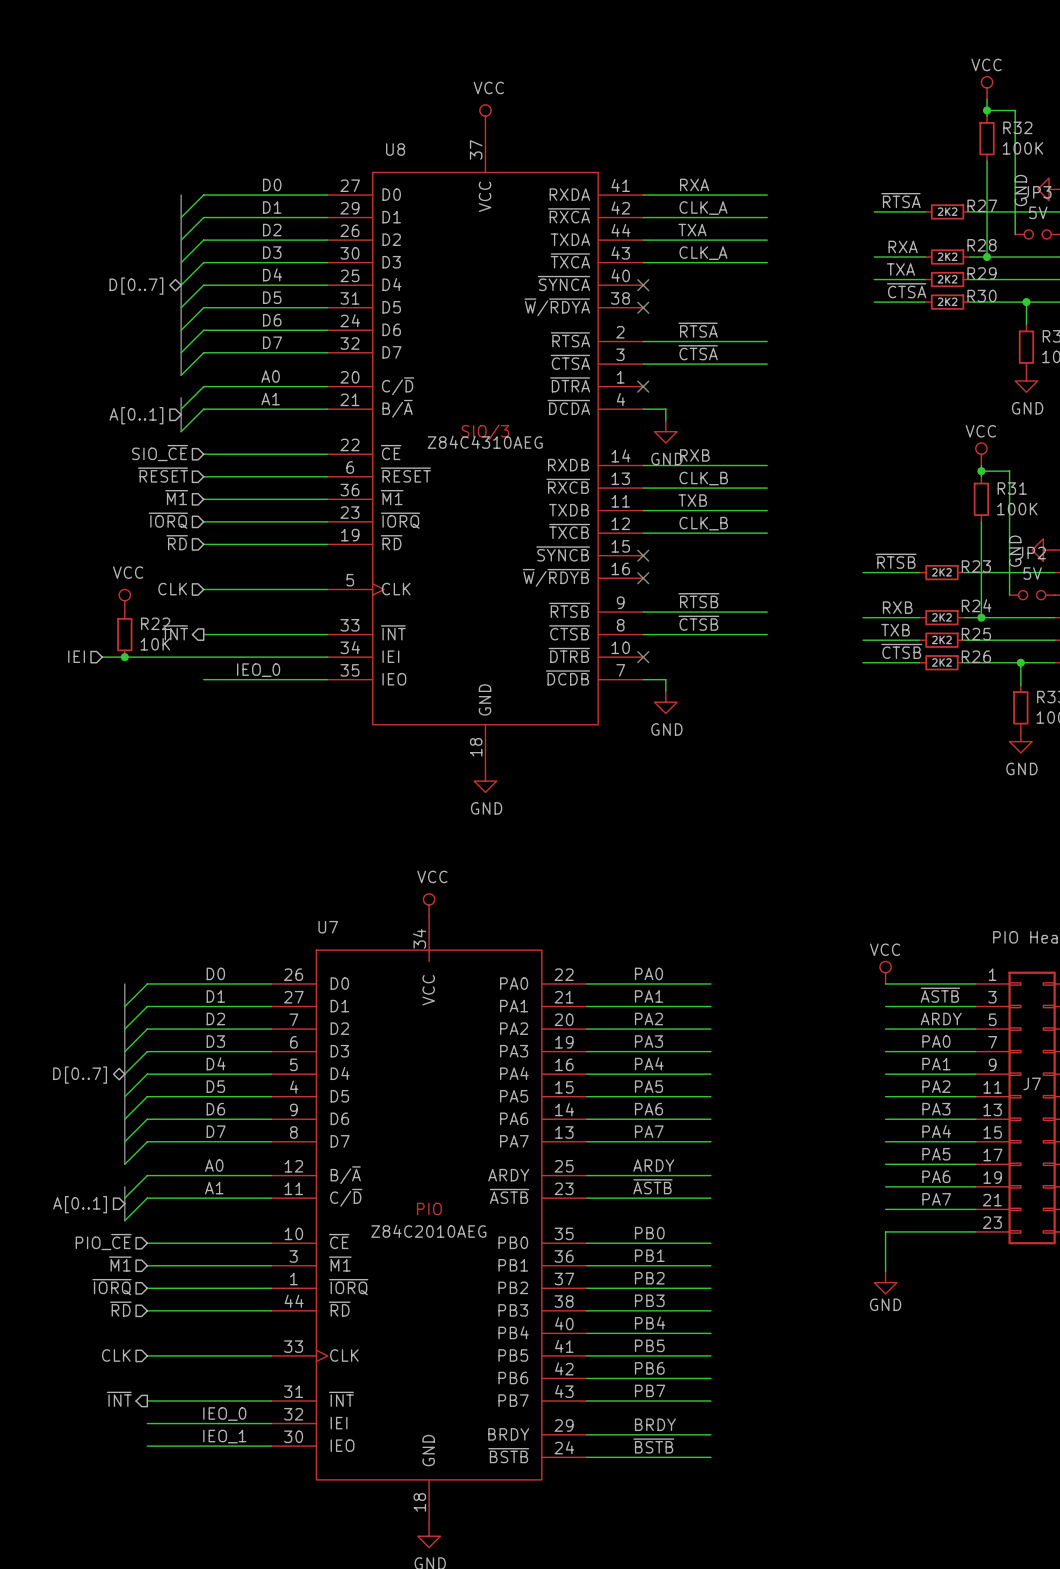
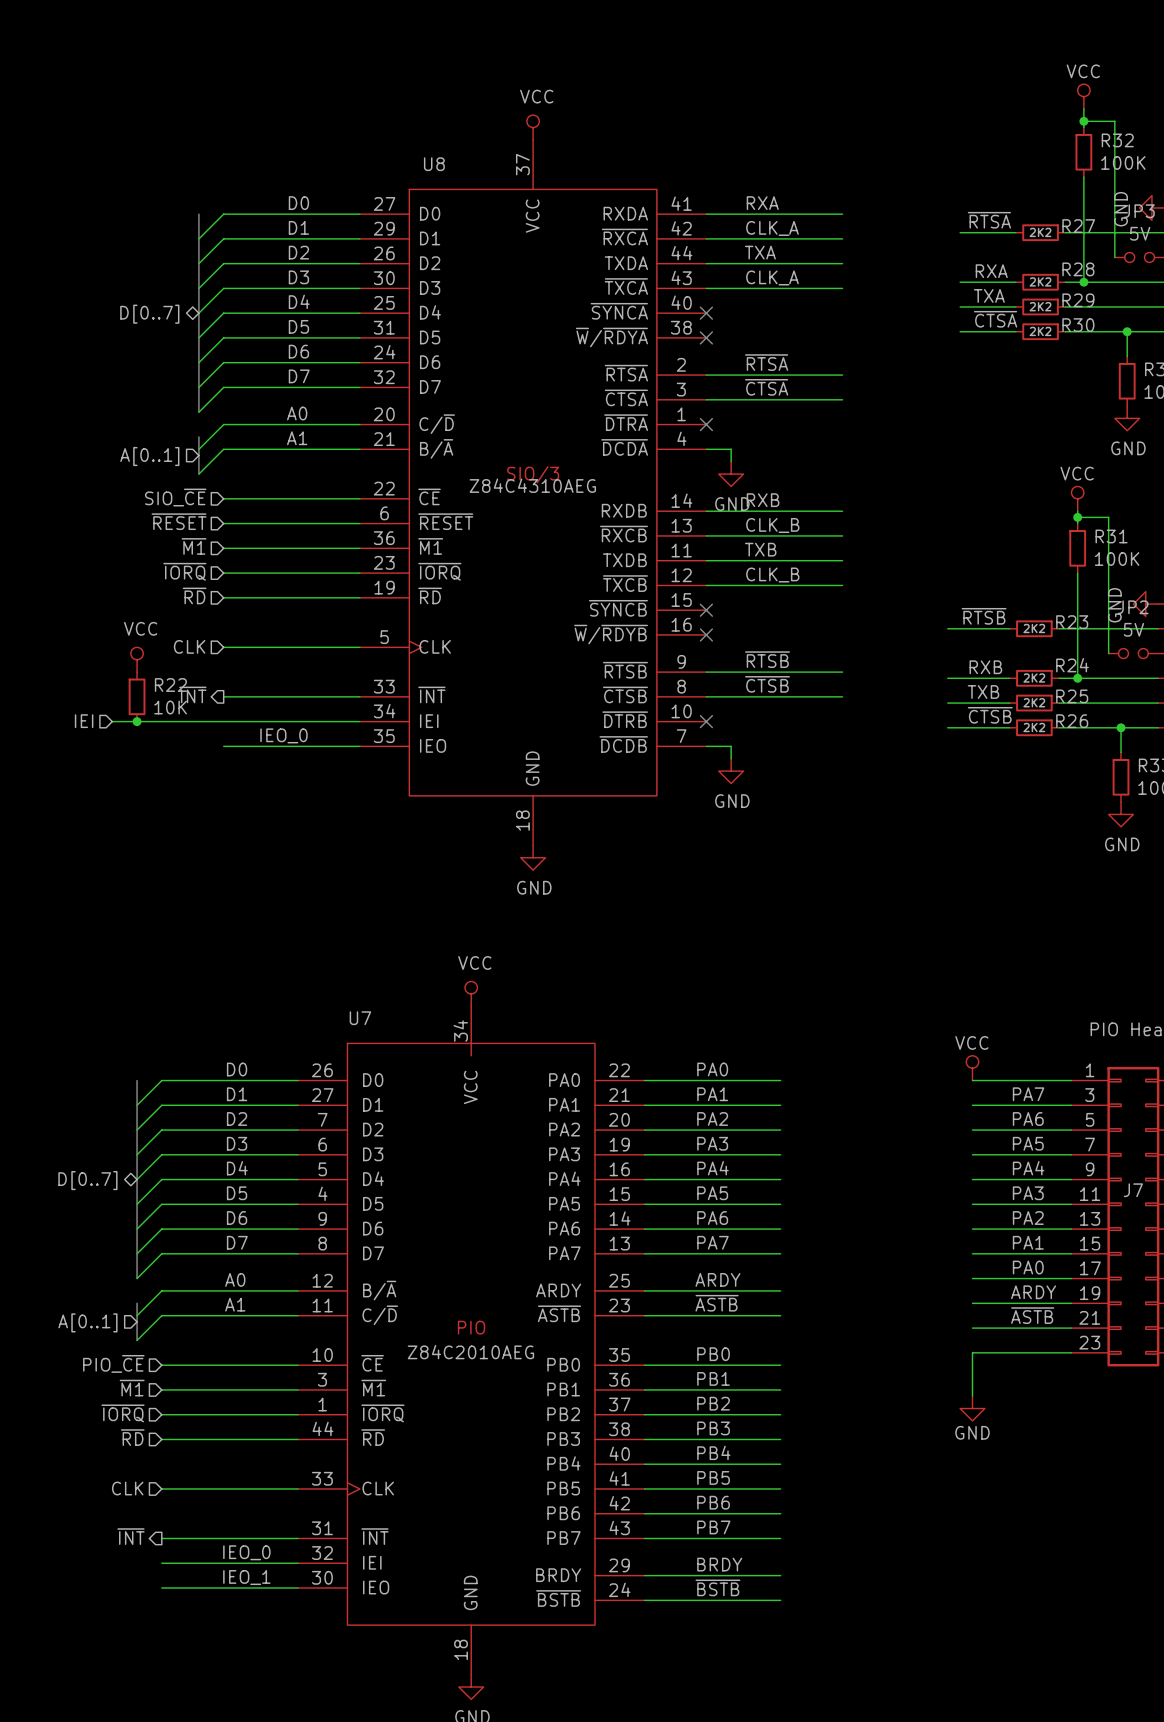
label: ~{ASTB} (940, 995) -> PA7 (1028, 1094)
label: ARDY (941, 1019) -> PA6 (1028, 1119)
label: PA0 (936, 1041) -> PA5 (1028, 1143)
label: PA1 (936, 1064) -> PA4 (1028, 1168)
label: PA2 (936, 1086) -> PA3 (1028, 1193)
label: PA3 (936, 1109) -> PA2 (1028, 1218)
label: PA4 (936, 1131) -> PA1 (1028, 1242)
label: PA5 (936, 1154) -> PA0 (1028, 1267)
label: PA6 (936, 1176) -> ARDY (1033, 1292)
label: PA7 (936, 1199) -> ~{ASTB} (1032, 1315)

